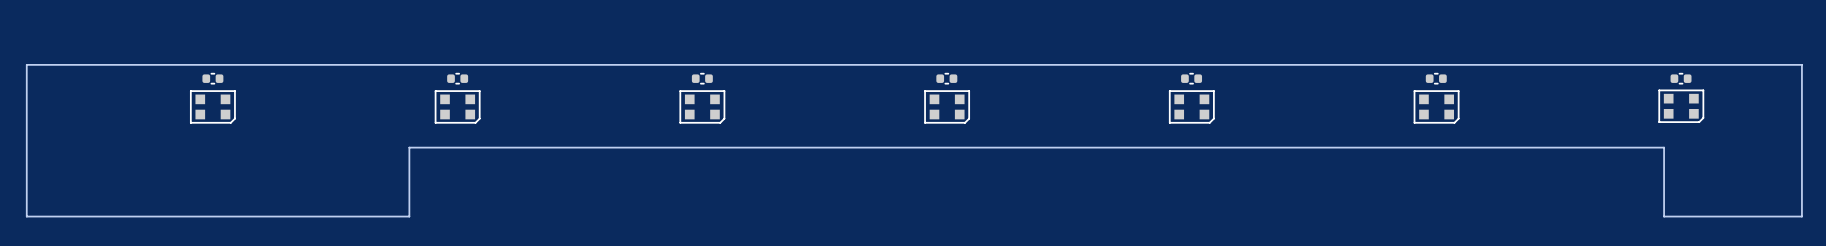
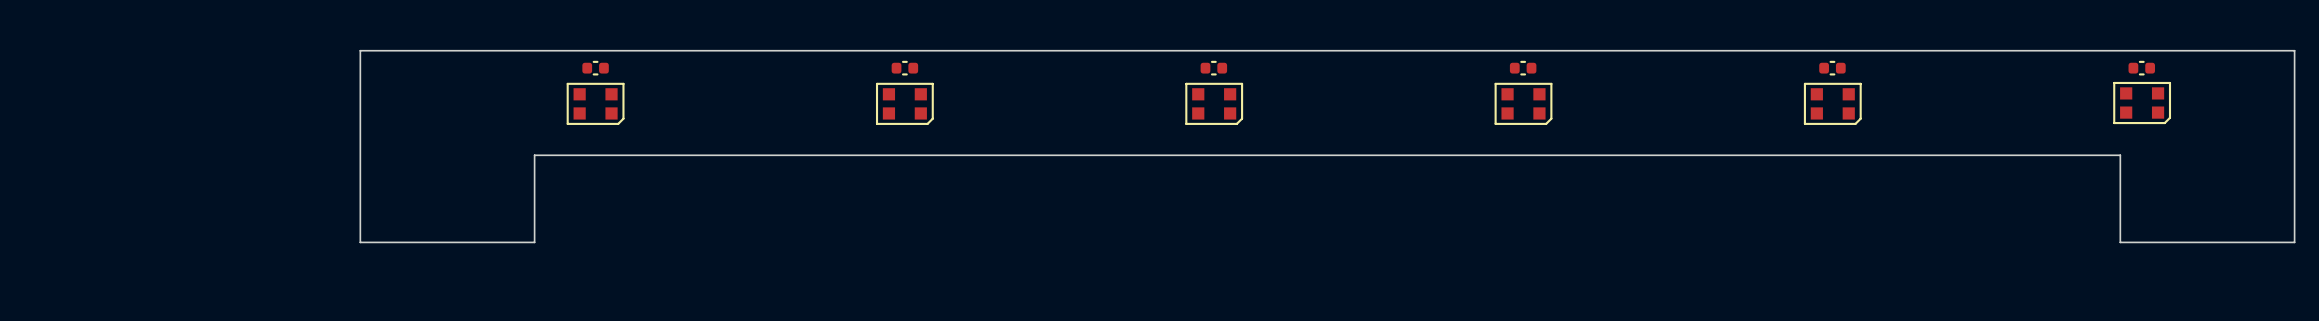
board edge: (271, 64) (26, 64) (26, 216) (271, 216) -> (360, 50) (360, 242)
part: (212, 78) -> none
part: (212, 106) -> none

